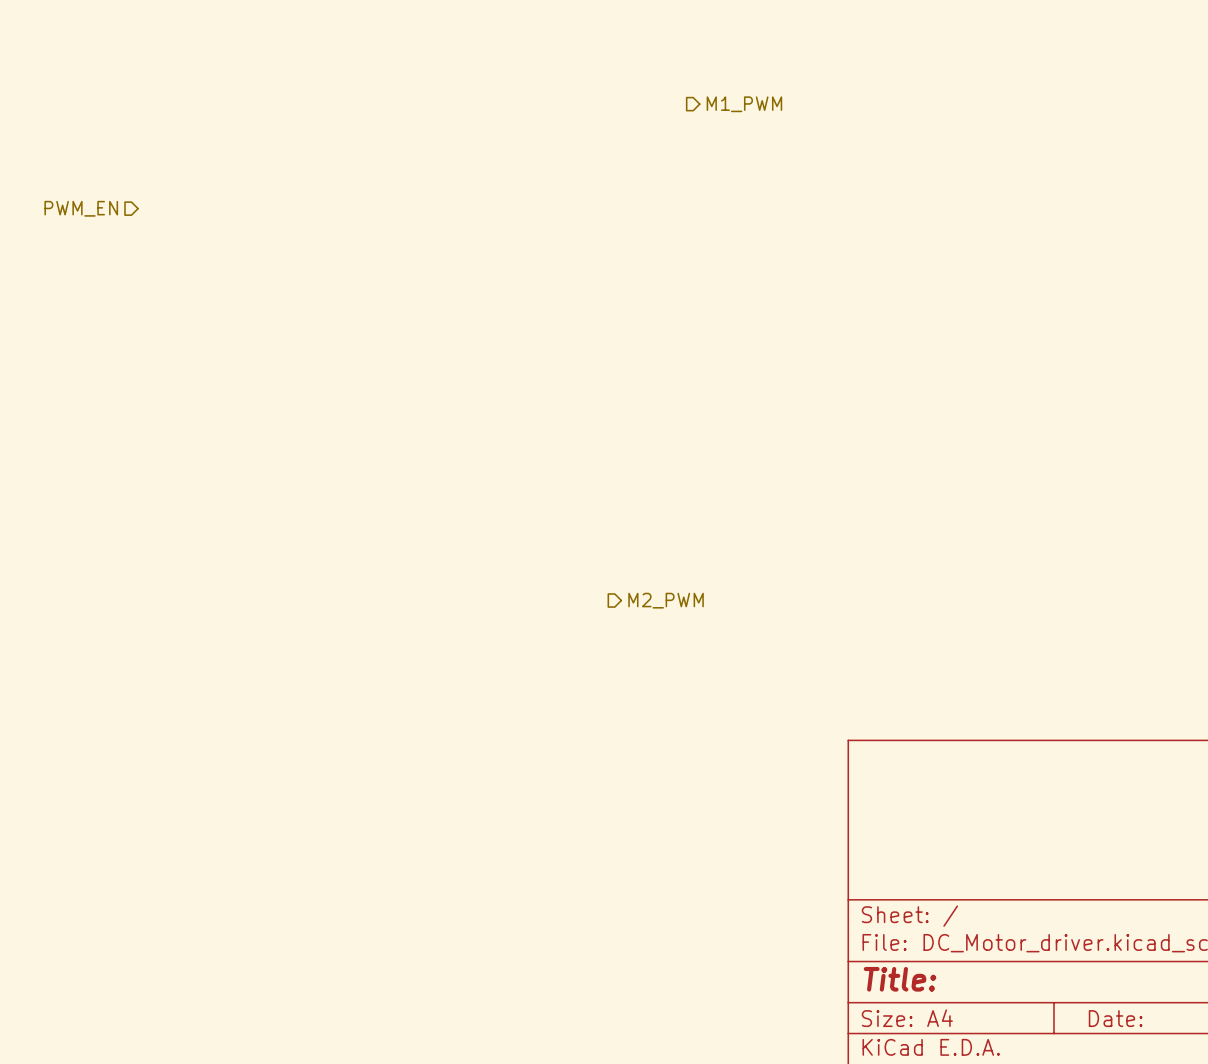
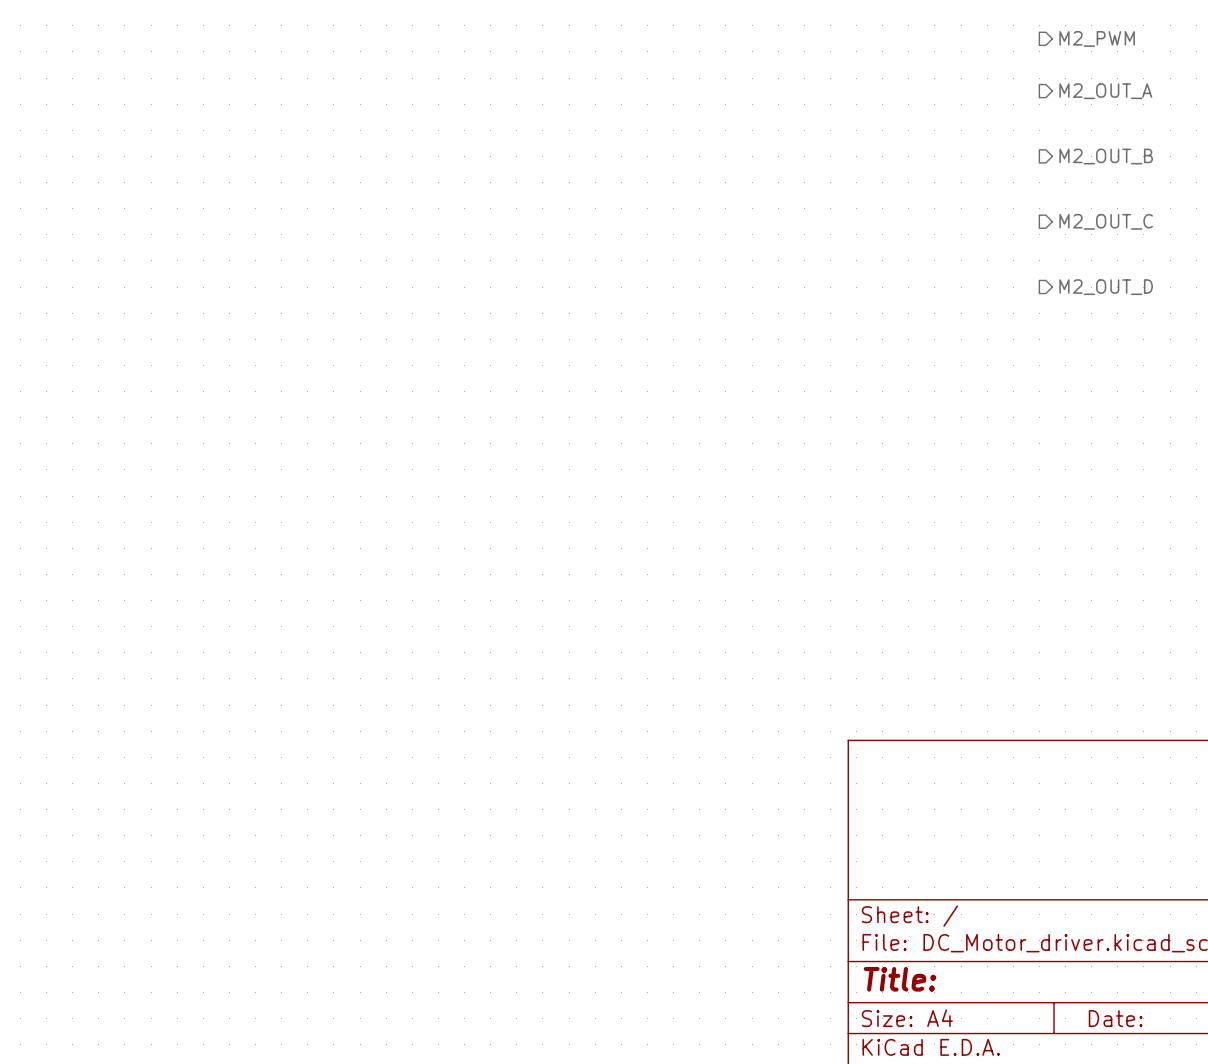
hierarchical label: none -> M2_PWM (1097, 38)
hierarchical label: none -> M2_OUT_A (1105, 91)
hierarchical label: M1_PWM (744, 104) -> none
hierarchical label: none -> M2_OUT_B (1106, 156)
hierarchical label: PWM_EN (81, 208) -> none
hierarchical label: none -> M2_OUT_C (1106, 221)
hierarchical label: none -> M2_OUT_D (1106, 287)
hierarchical label: M2_PWM (666, 600) -> none

